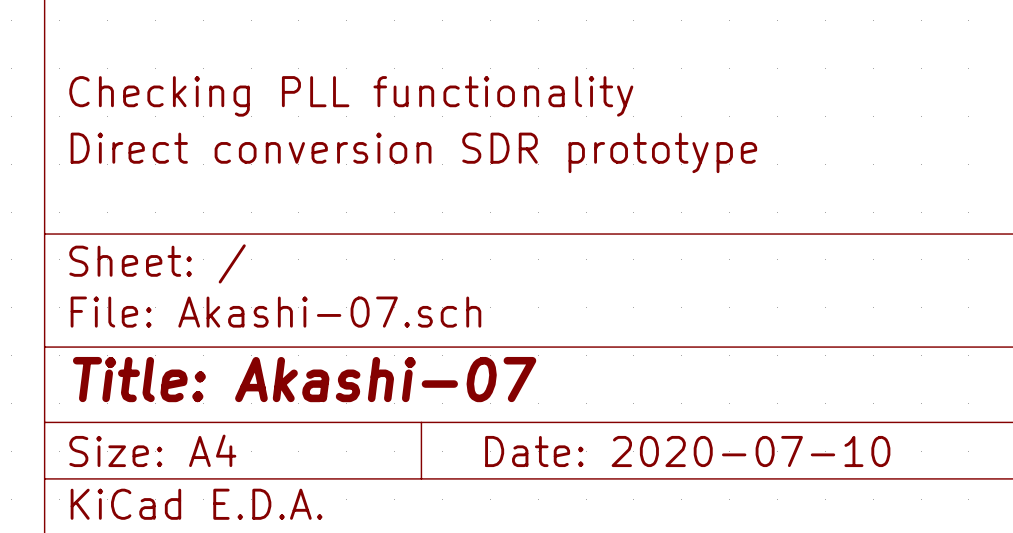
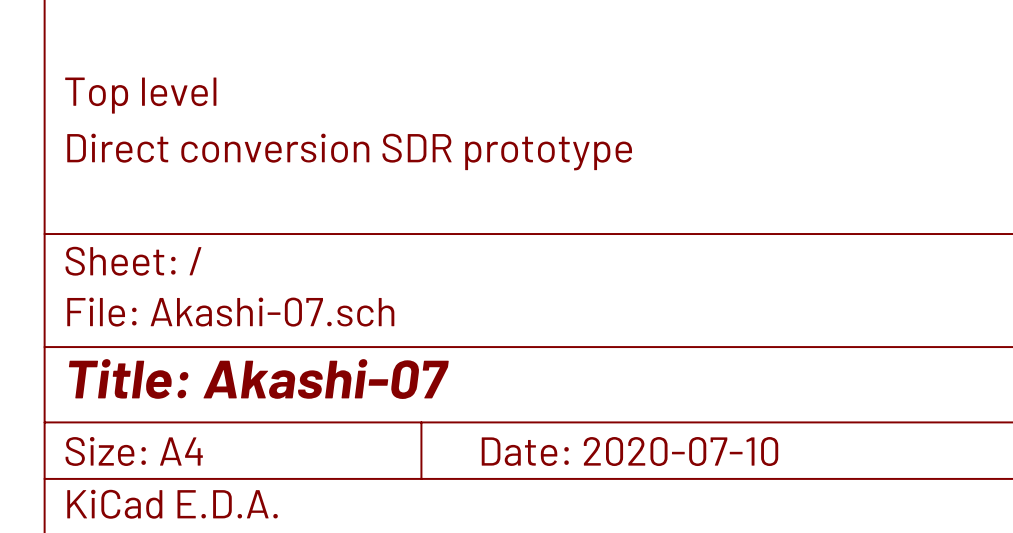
title block: Checking PLL functionality (351, 96) -> Top level (140, 95)

